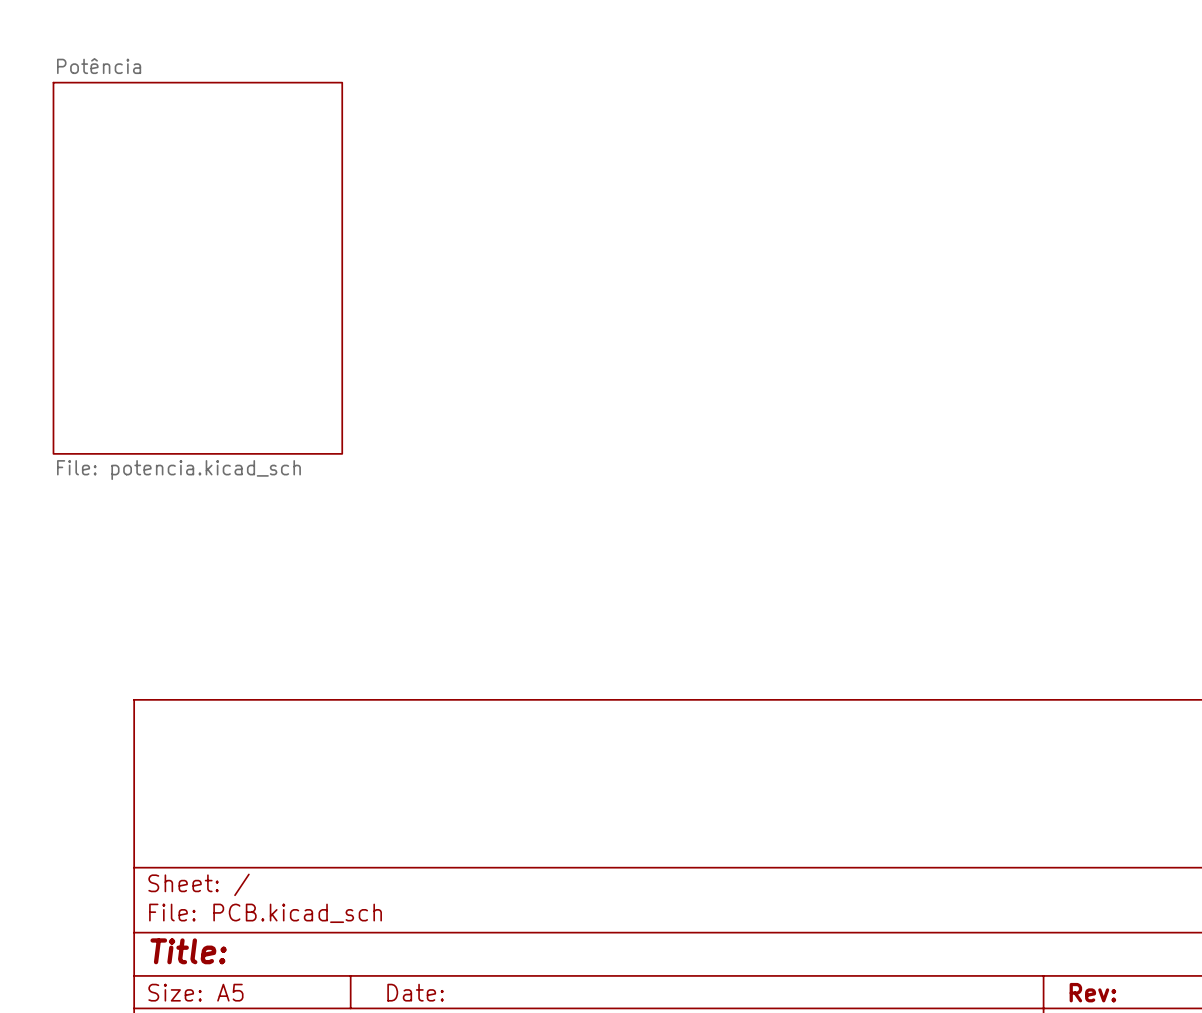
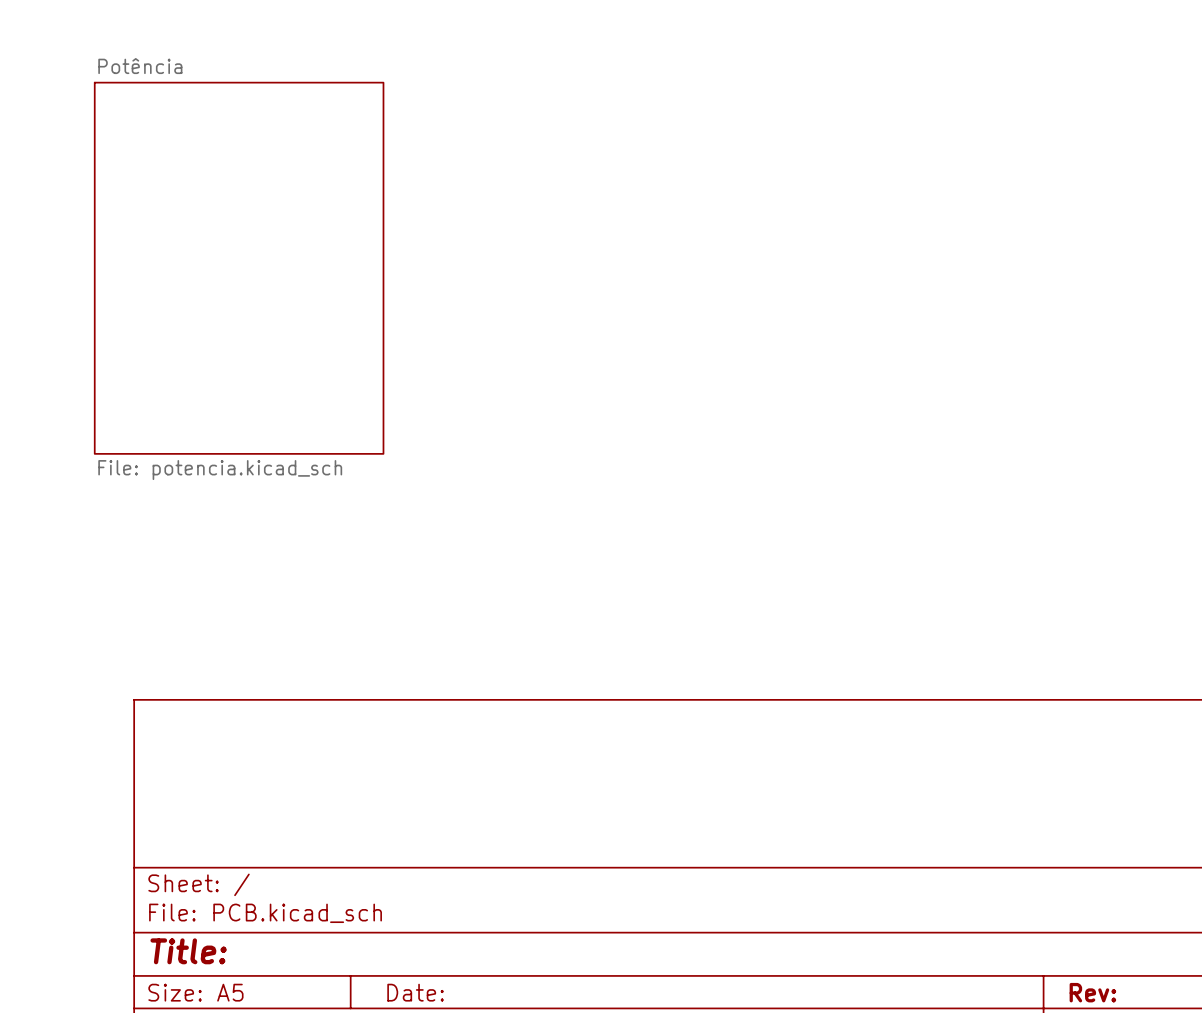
sheet Potência position: (197, 268) -> (239, 268)

